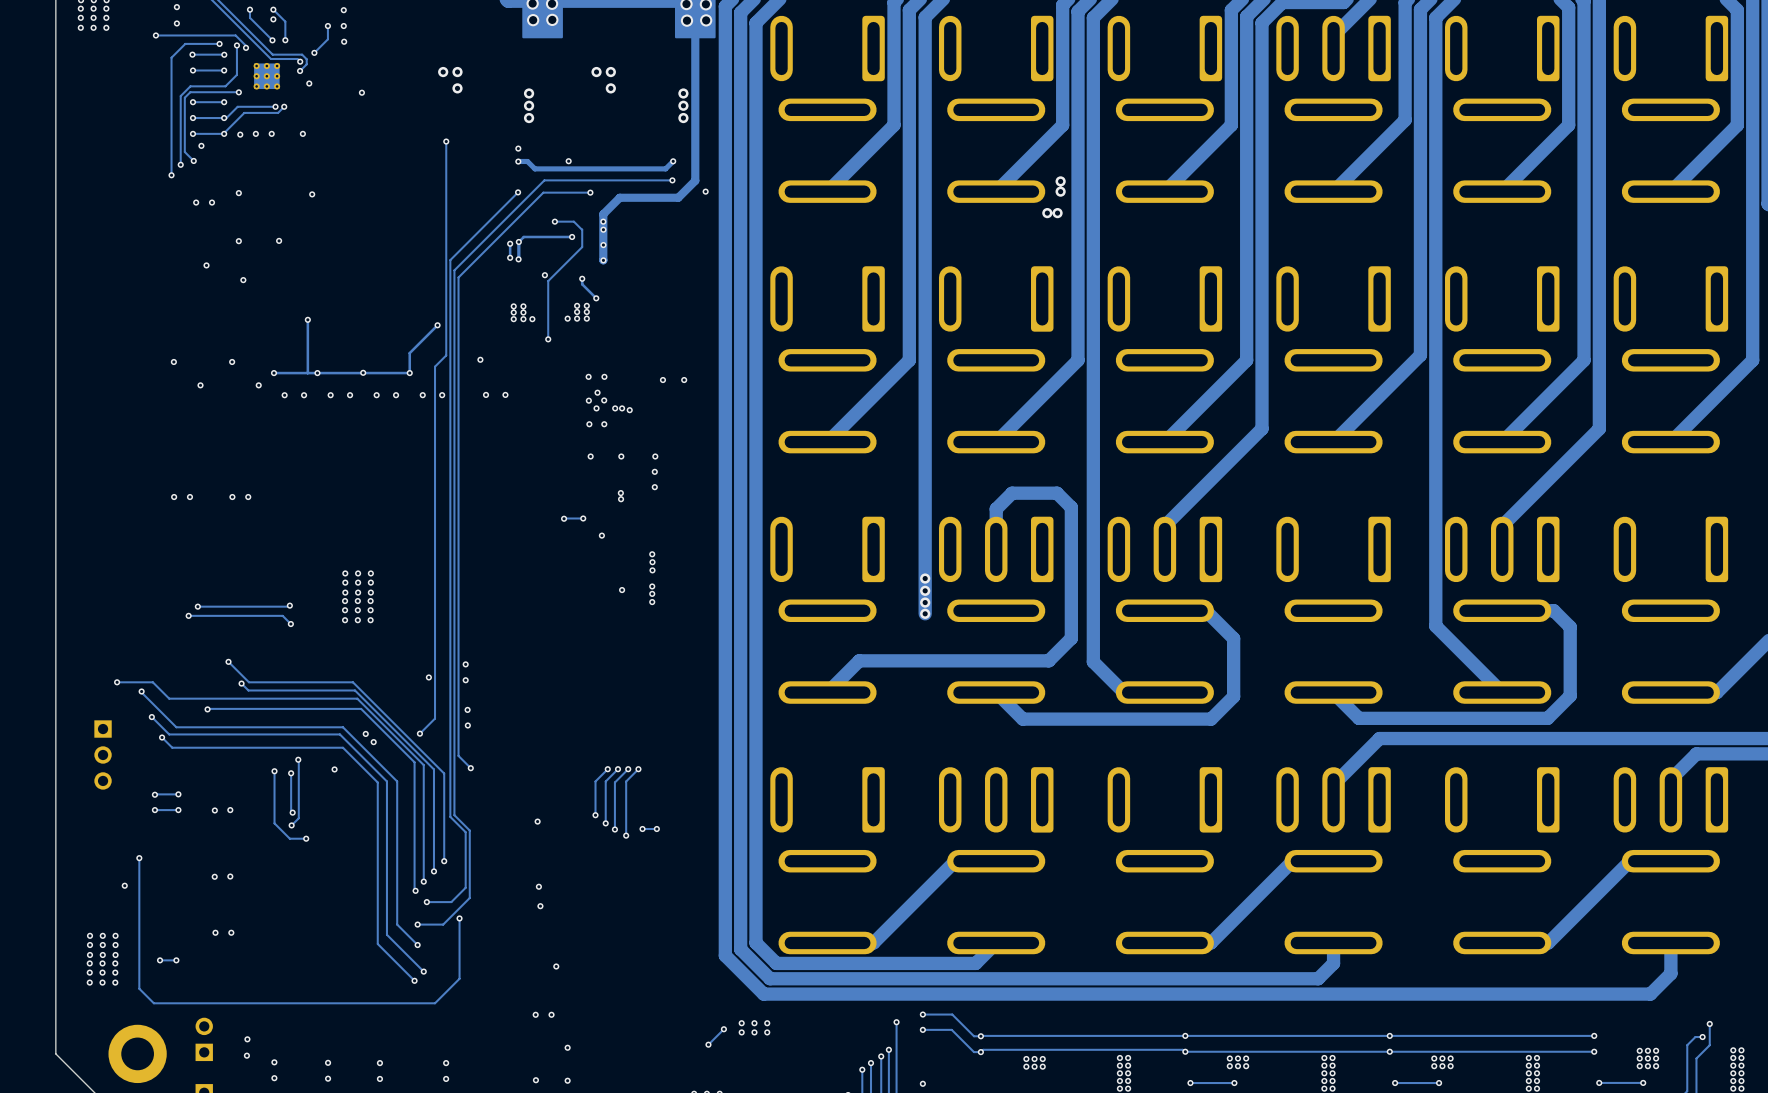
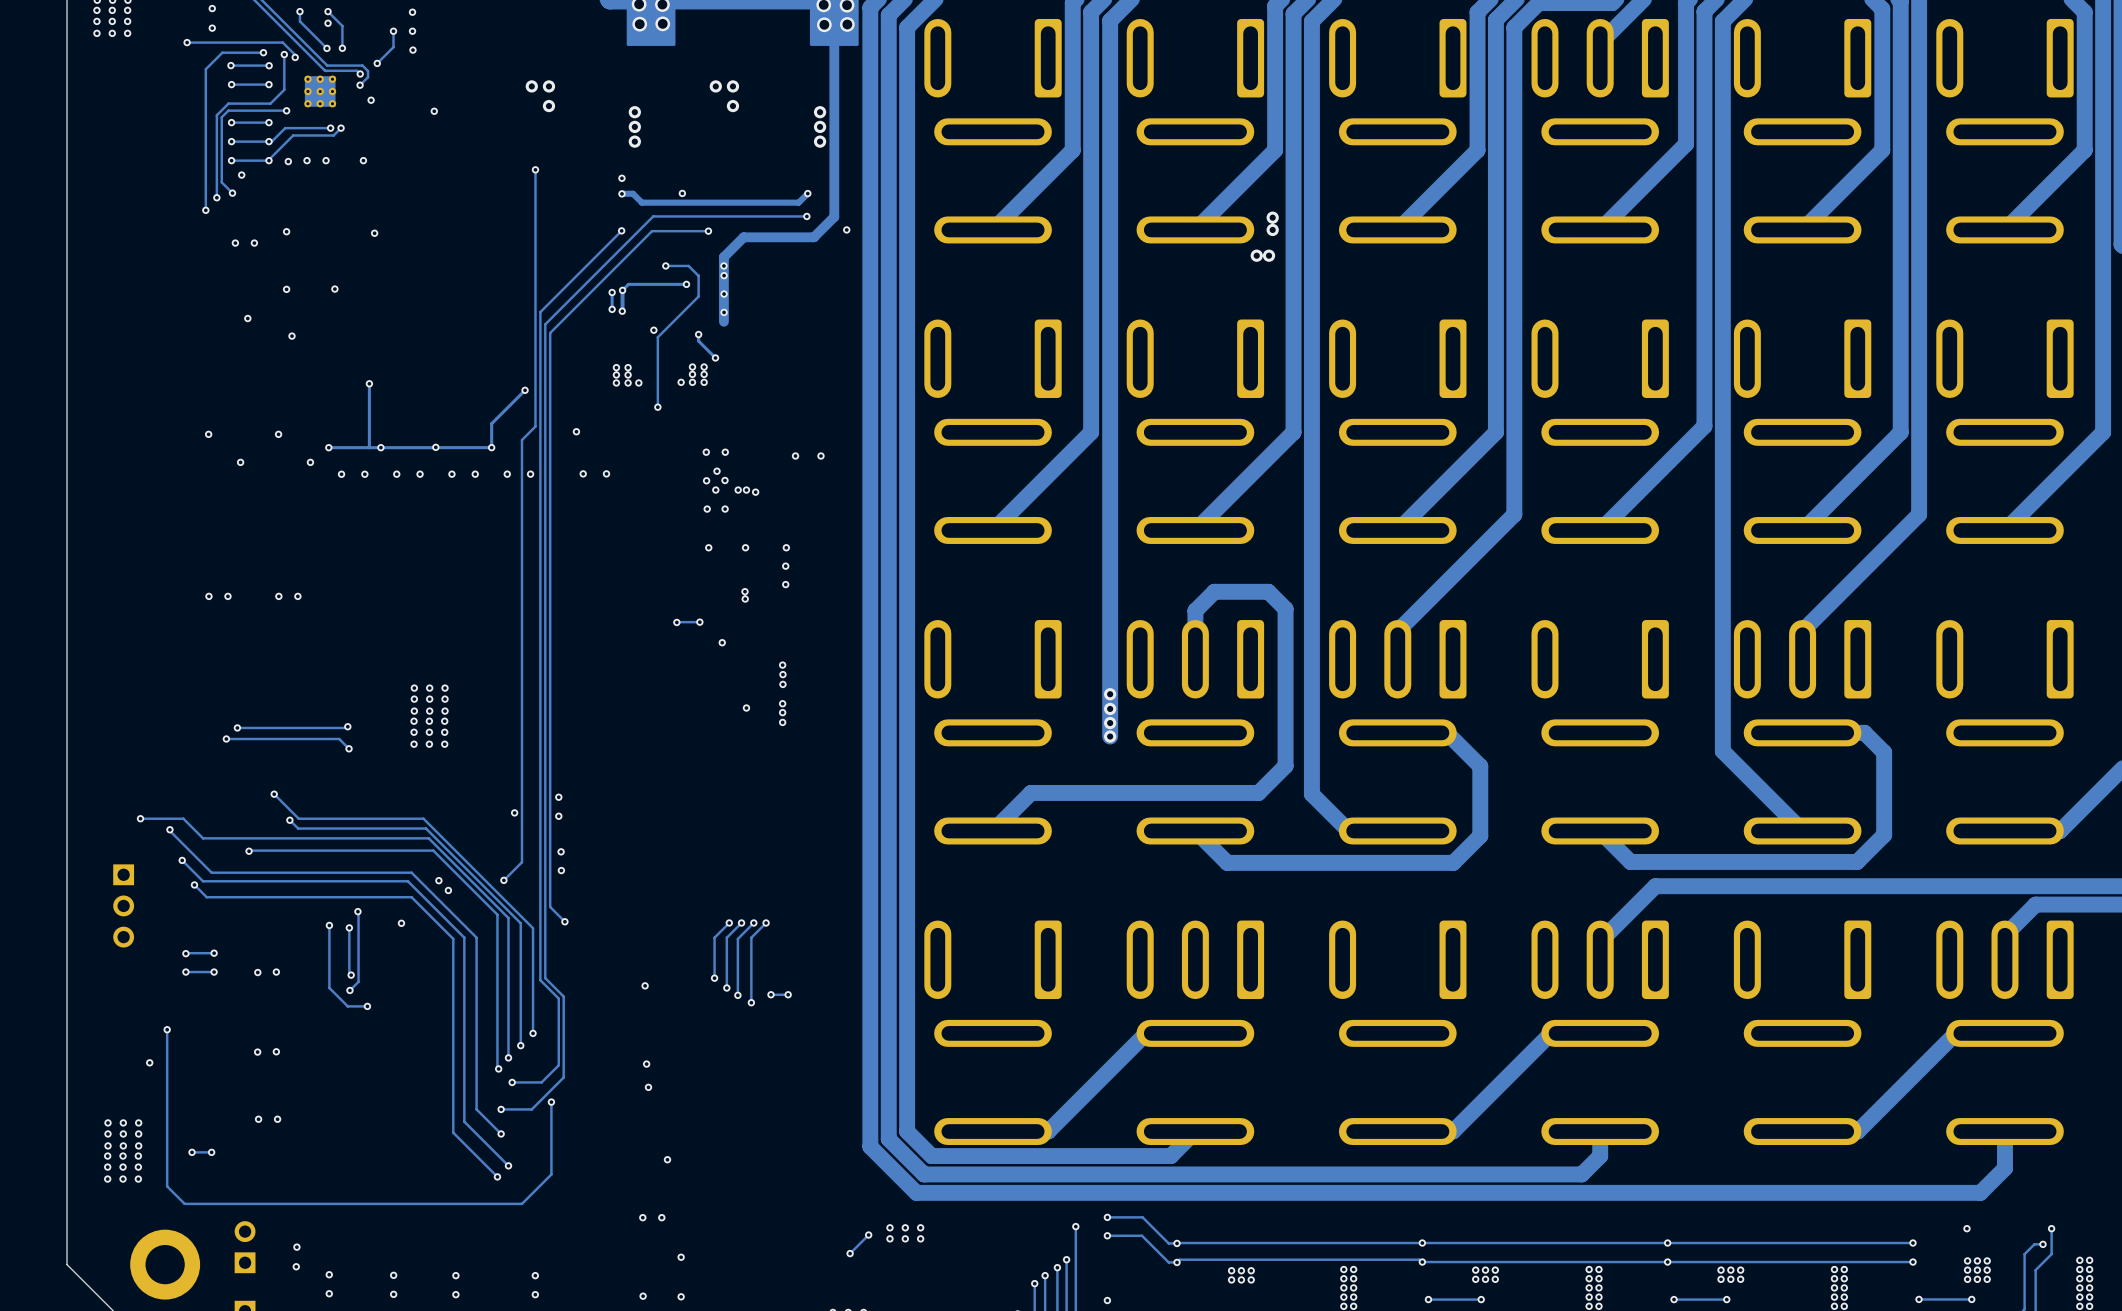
track: none -> (723, 312) (723, 321)
via: none -> (1966, 1228)

